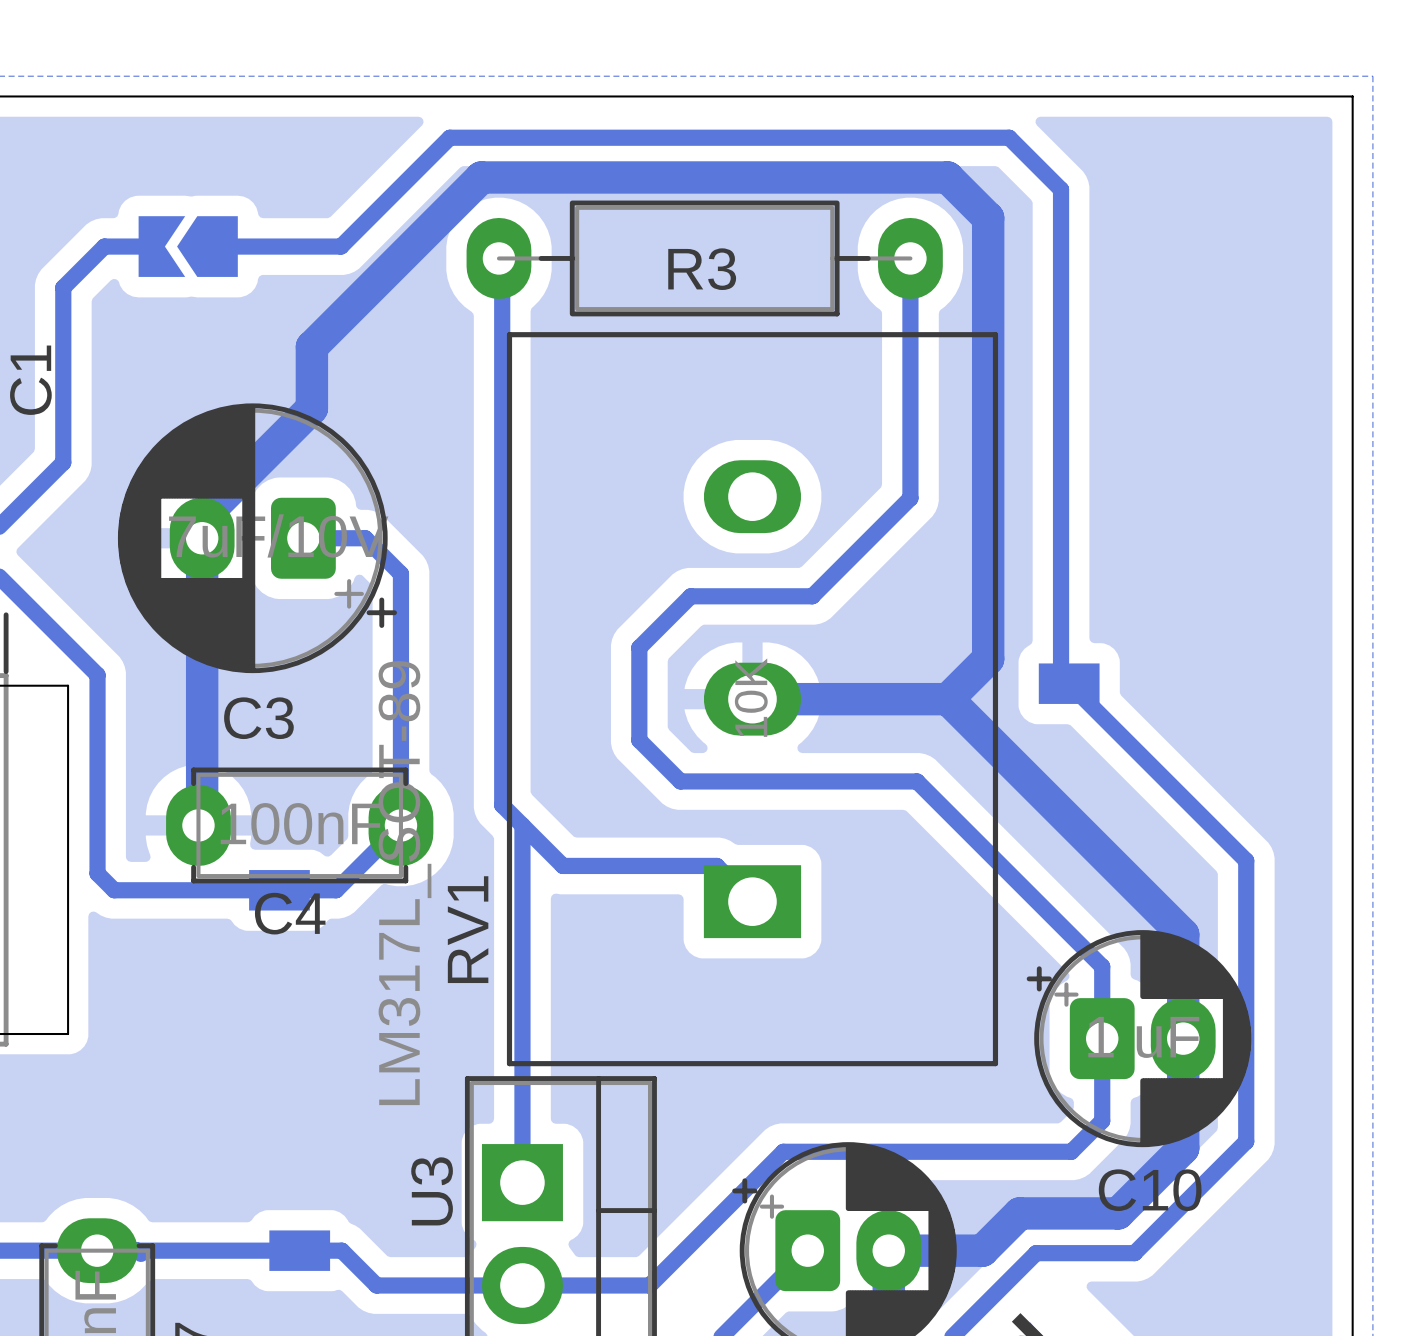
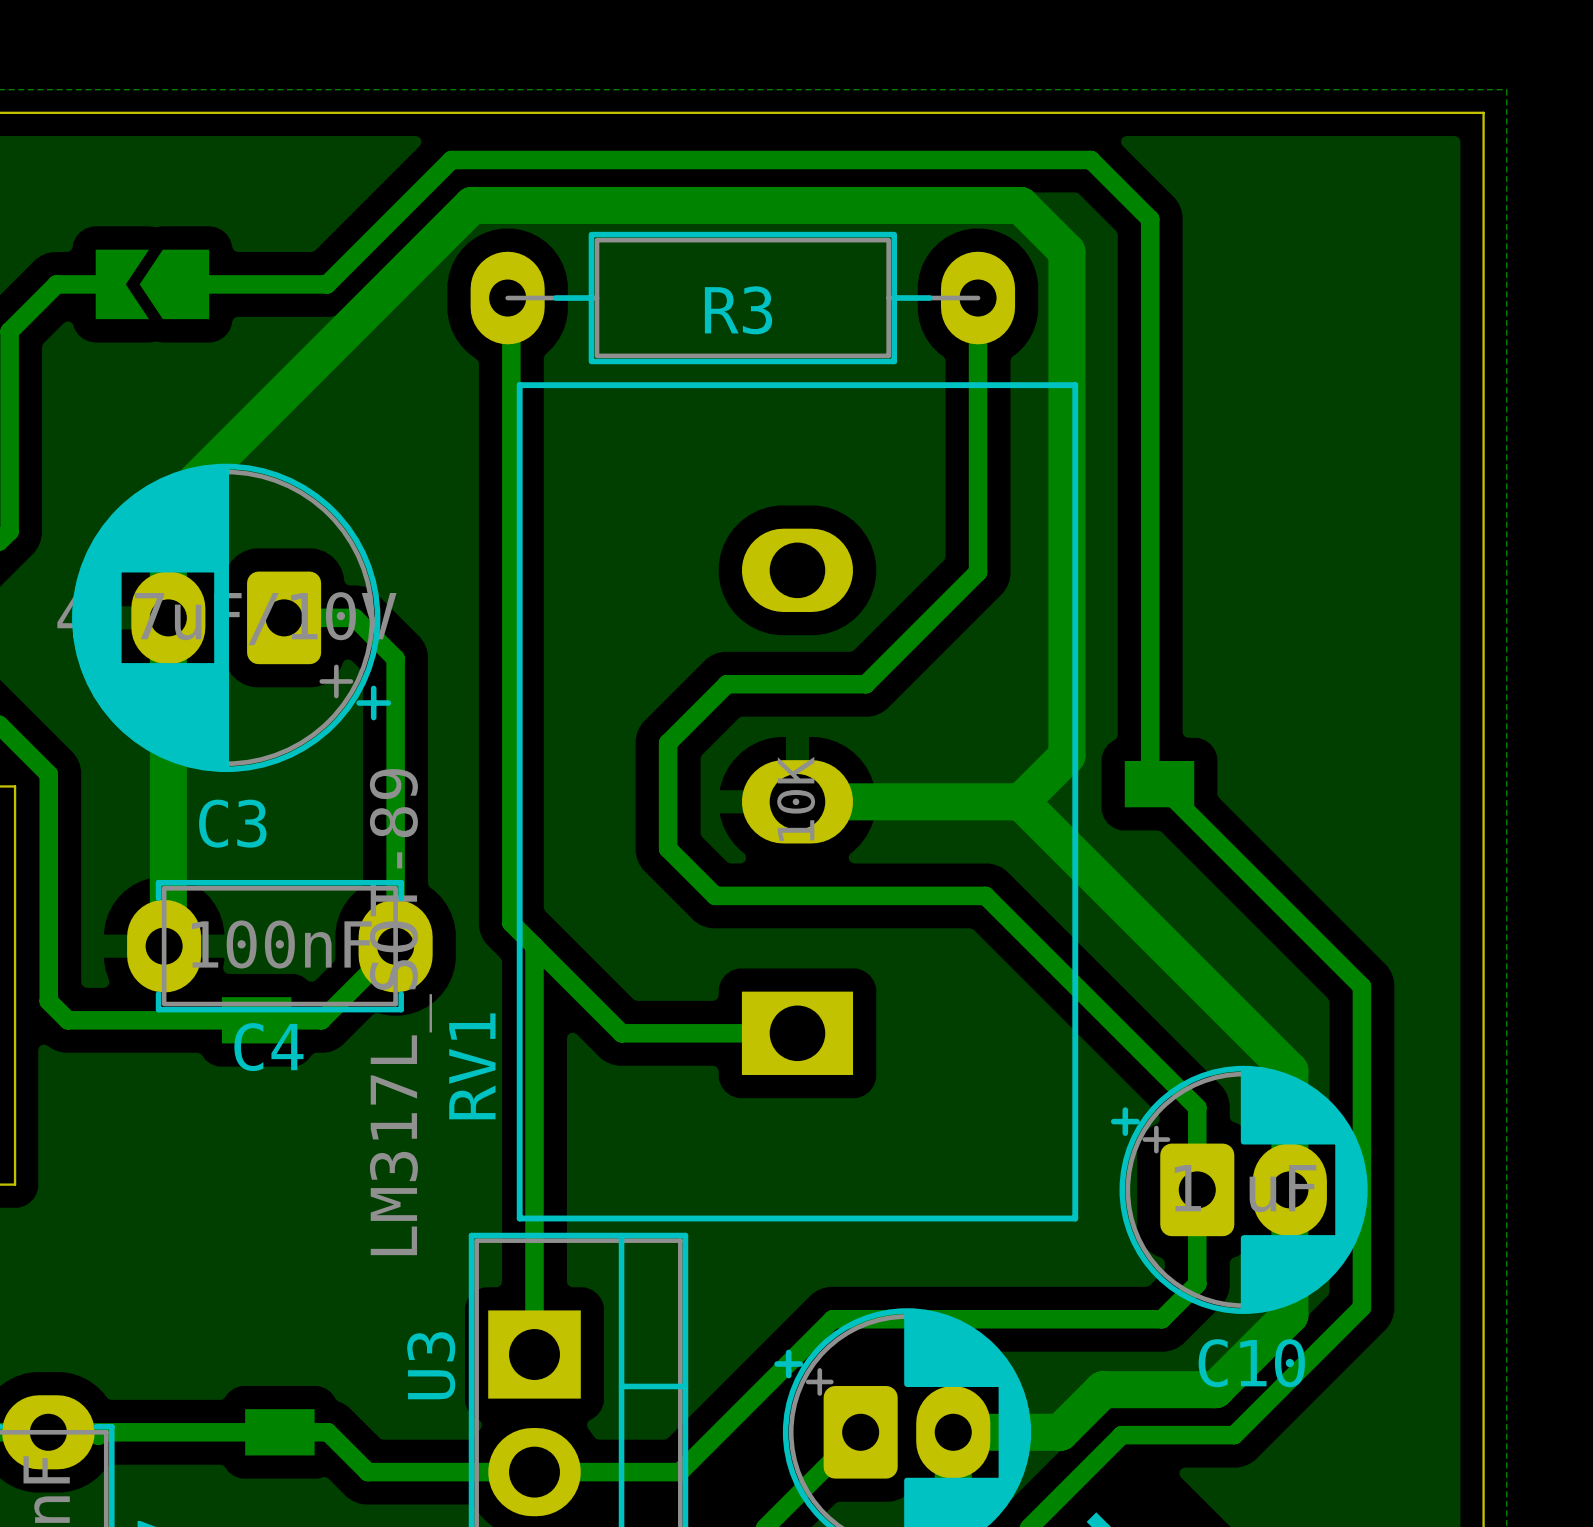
bottom track: (481, 177) (311, 346) (311, 408) (202, 518) -> (487, 205) (471, 205) (168, 509) (168, 594)
bottom track: (562, 865) (716, 865) (752, 901) -> (580, 992) (621, 1033) (797, 1033)

